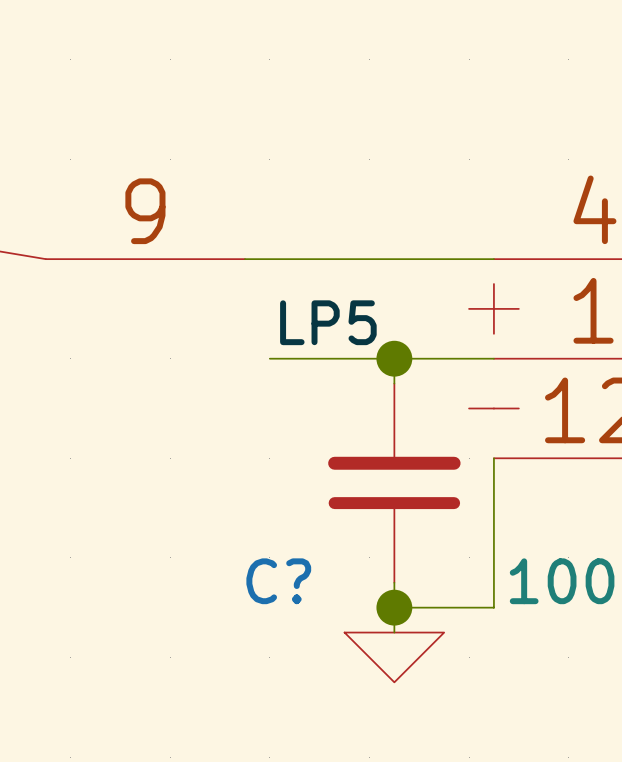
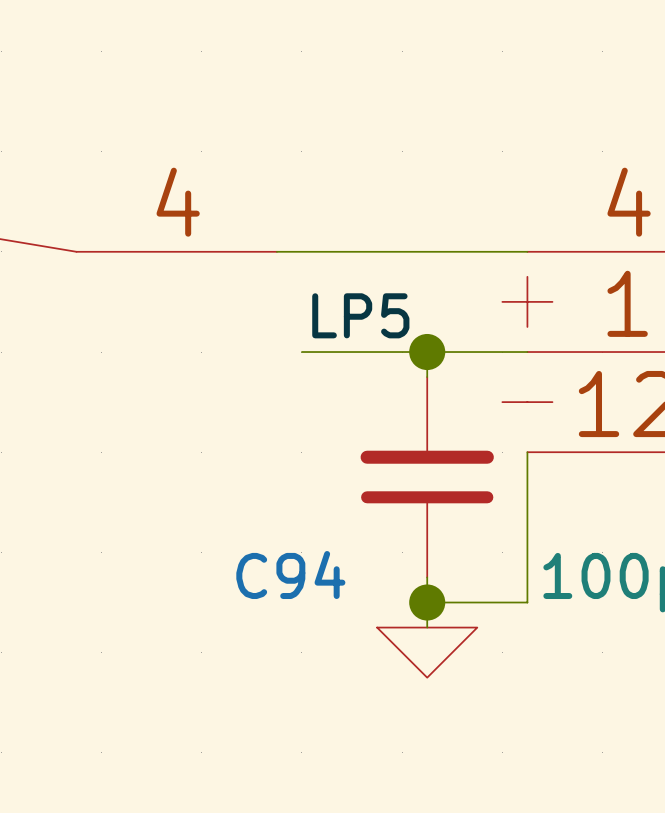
part pin number: 9 (145, 211) -> 4 (178, 202)
C? name: C? (278, 581) -> C94 (290, 575)

